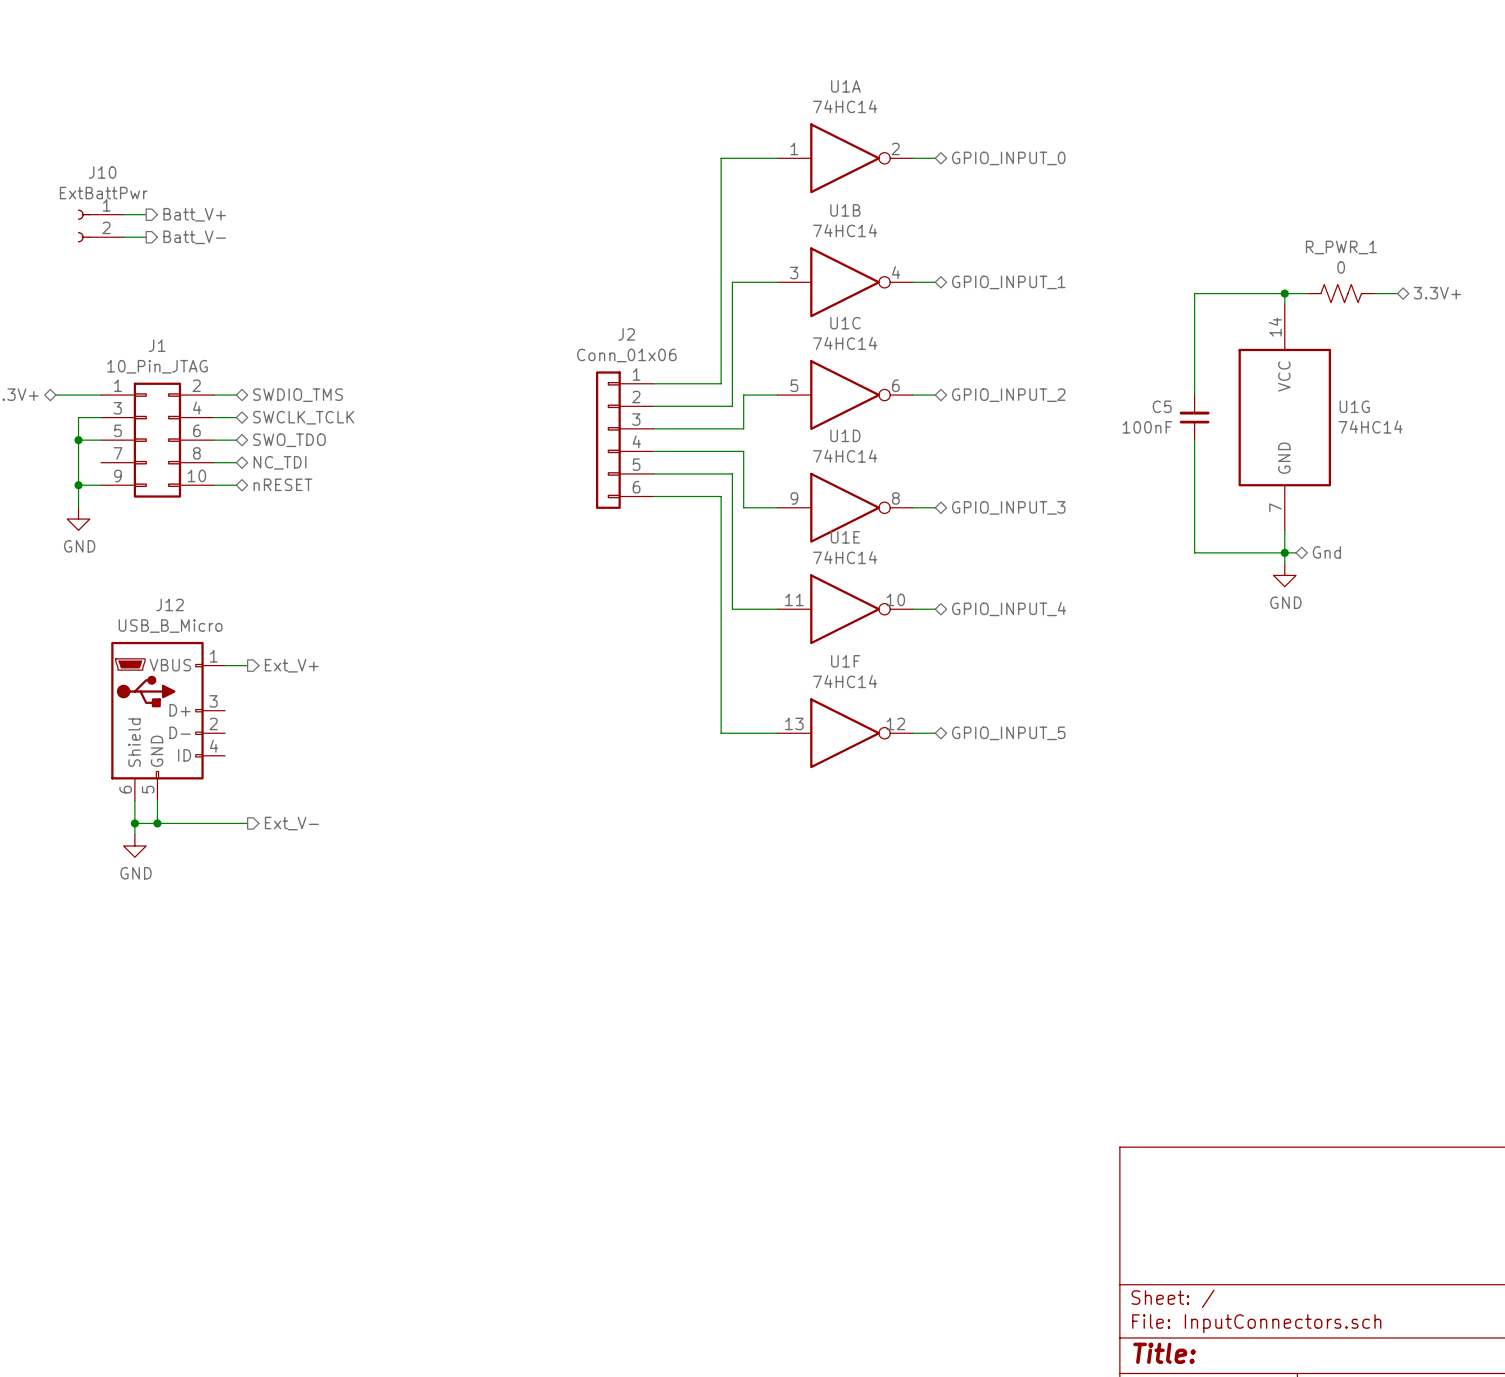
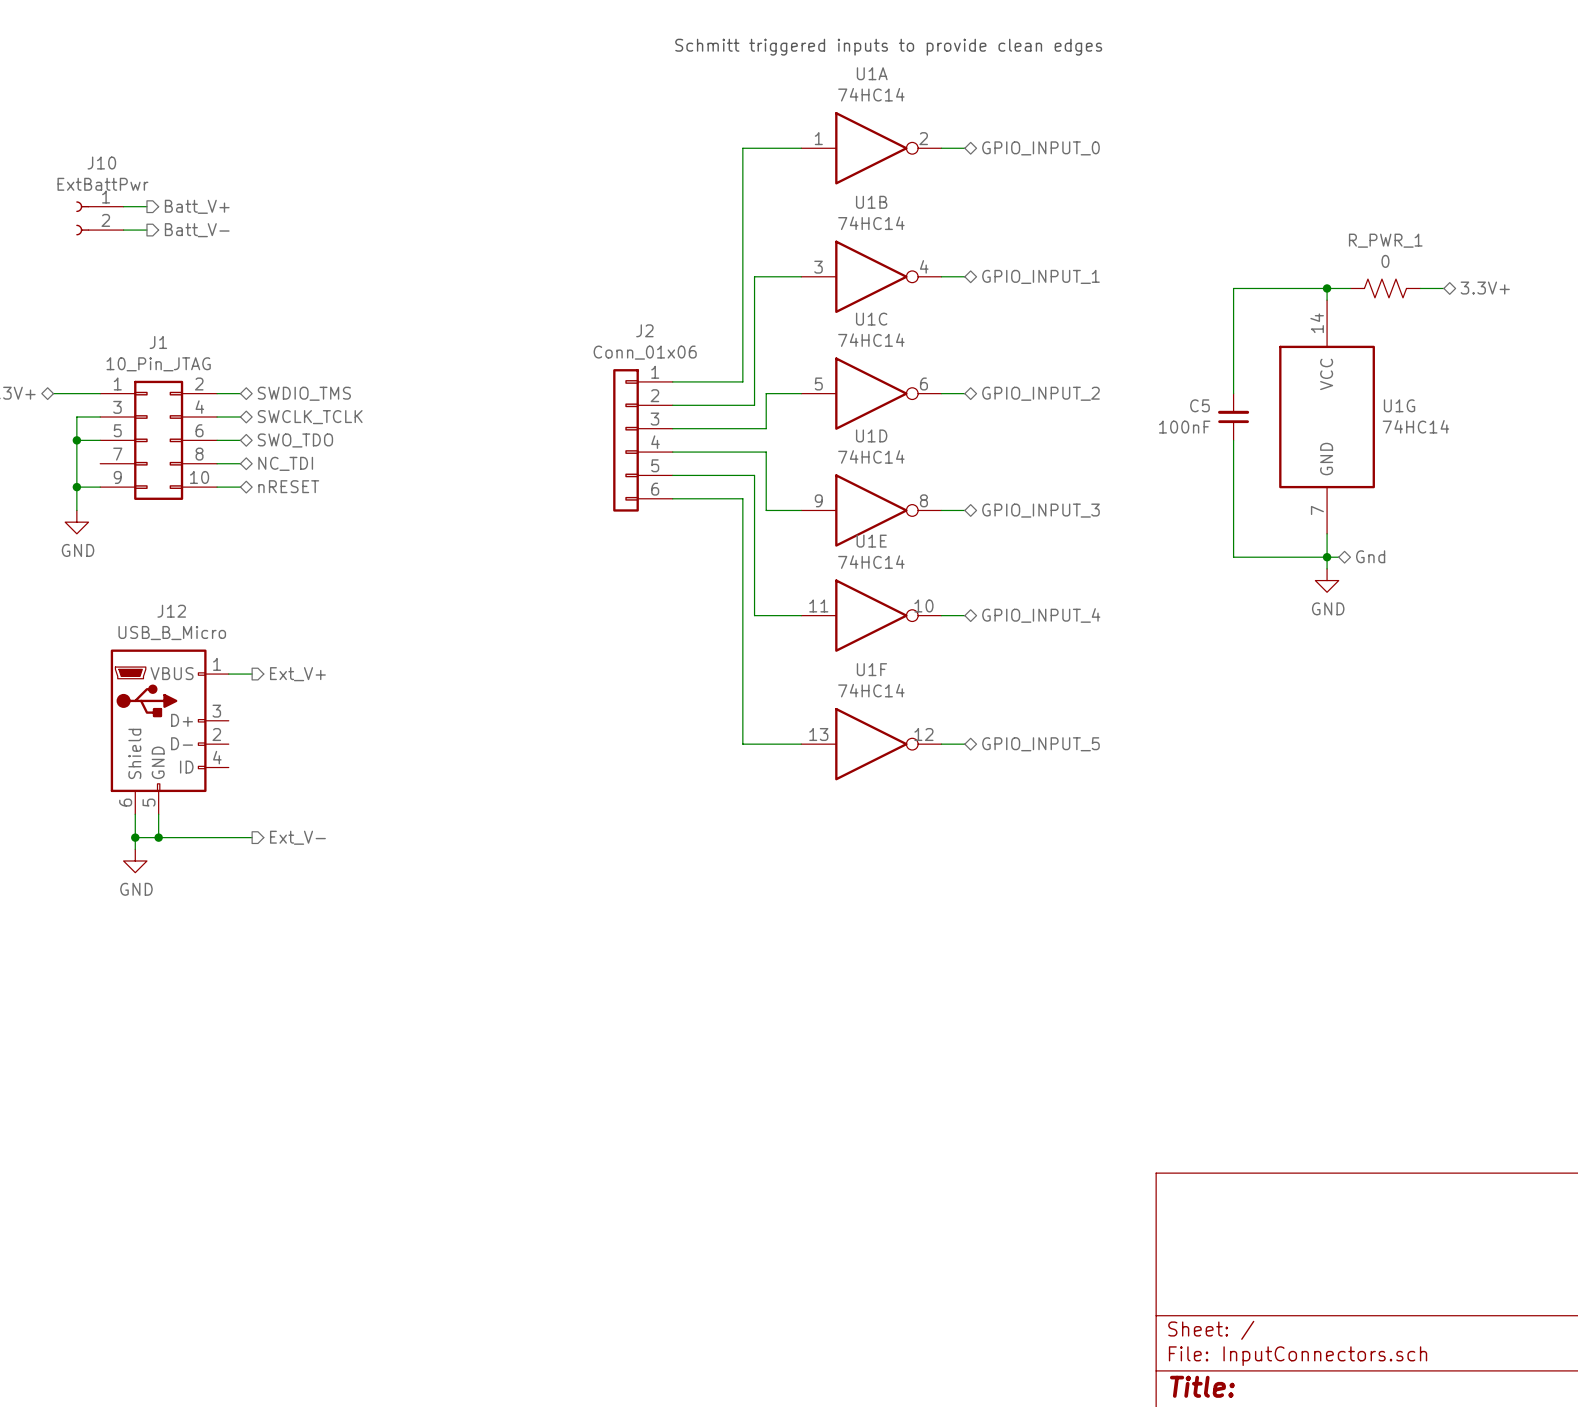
text: none -> Schmitt triggered inputs to provide clean edges (888, 47)

